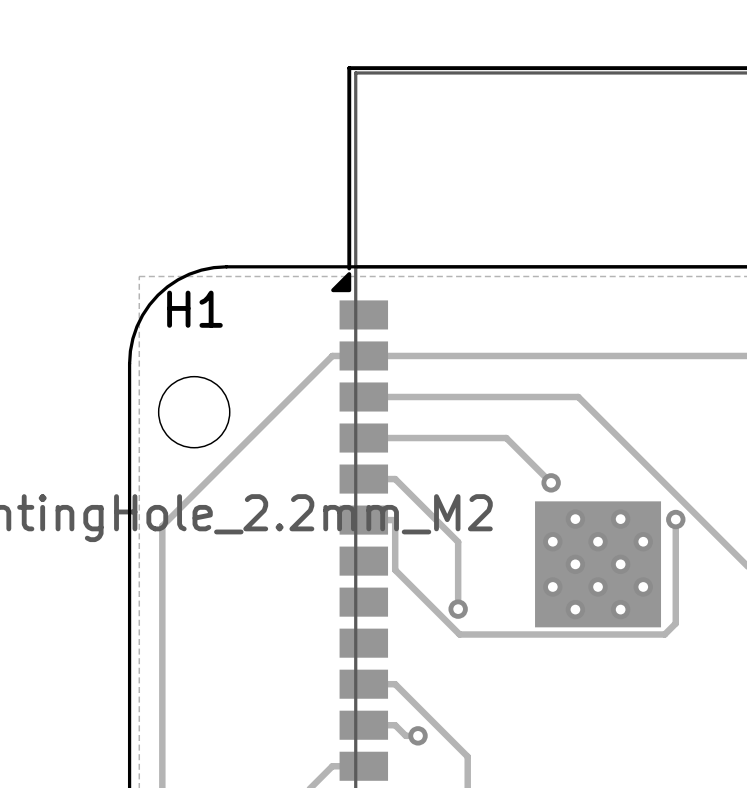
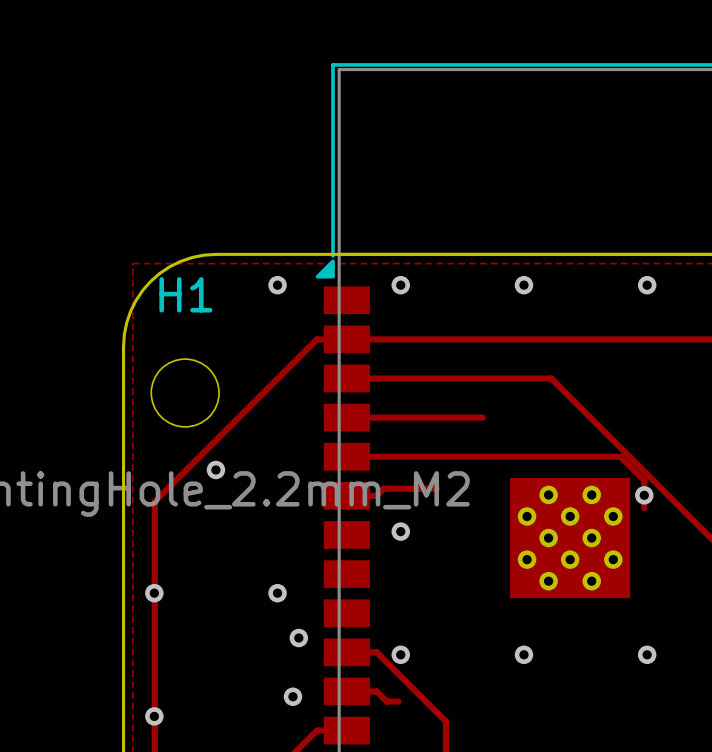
via: none -> (277, 285)
via: none -> (400, 285)
via: none -> (523, 285)
via: none -> (647, 285)
track: (506, 438) (551, 482) -> none
track: (395, 479) (458, 542) (458, 609) -> (376, 456) (620, 456) (644, 480) (644, 495)
via: (551, 482) -> none
via: none -> (215, 469)
track: (395, 520) (395, 570) (459, 634) (664, 634) (675, 623) (675, 532) -> (376, 495) (383, 488) (436, 488)
via: none -> (400, 531)
via: (458, 609) -> none
via: none -> (154, 593)
via: none -> (277, 593)
via: none -> (298, 638)
via: none -> (400, 654)
via: none -> (523, 654)
via: none -> (647, 654)
via: none -> (292, 696)
via: (418, 735) -> none
via: none -> (154, 716)

